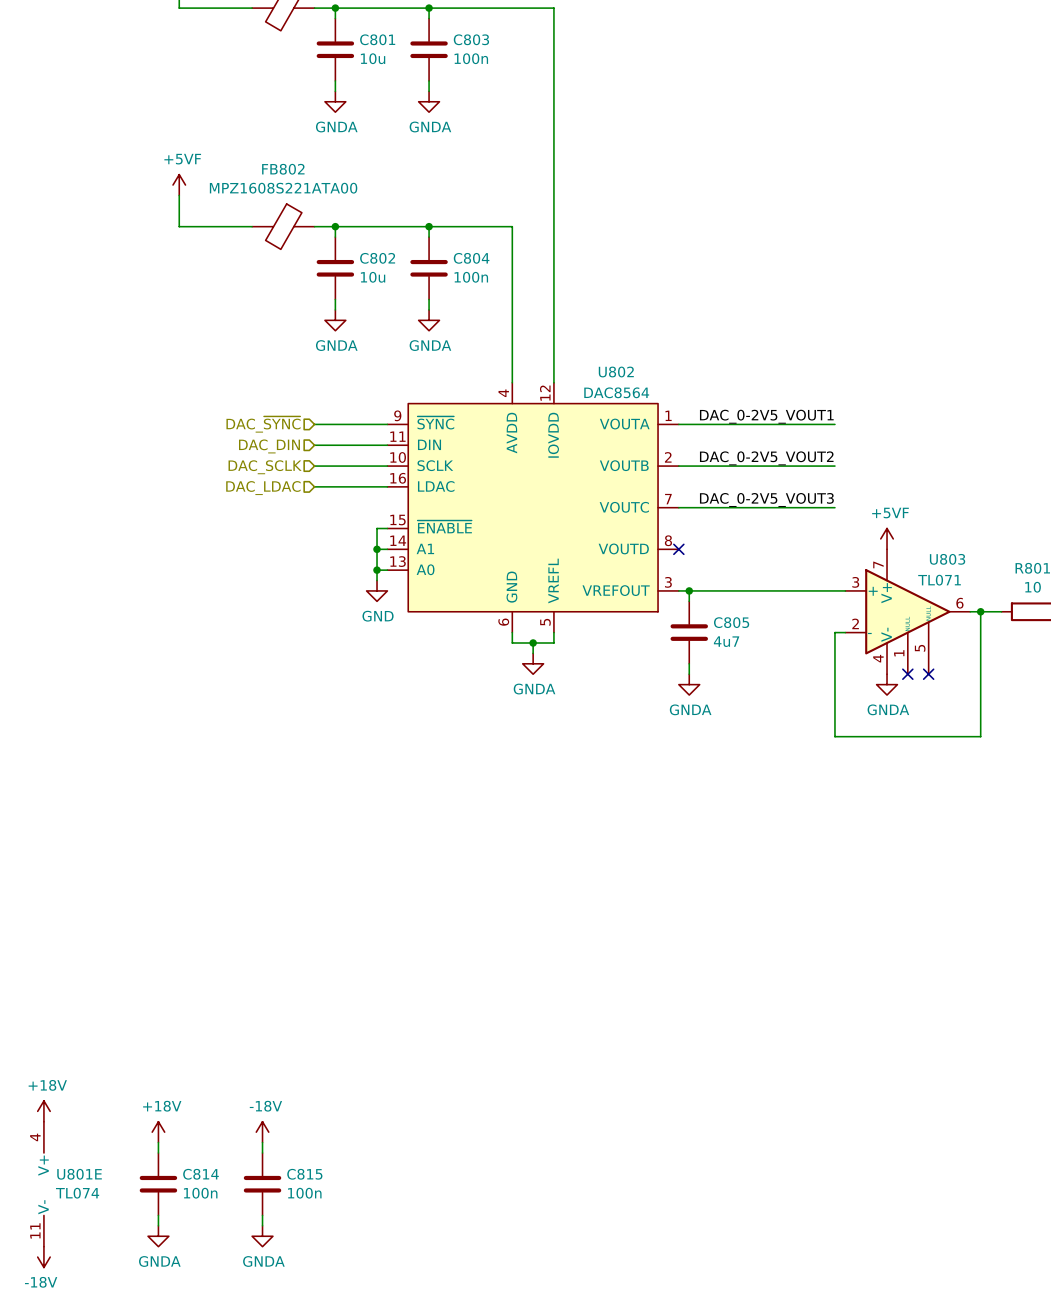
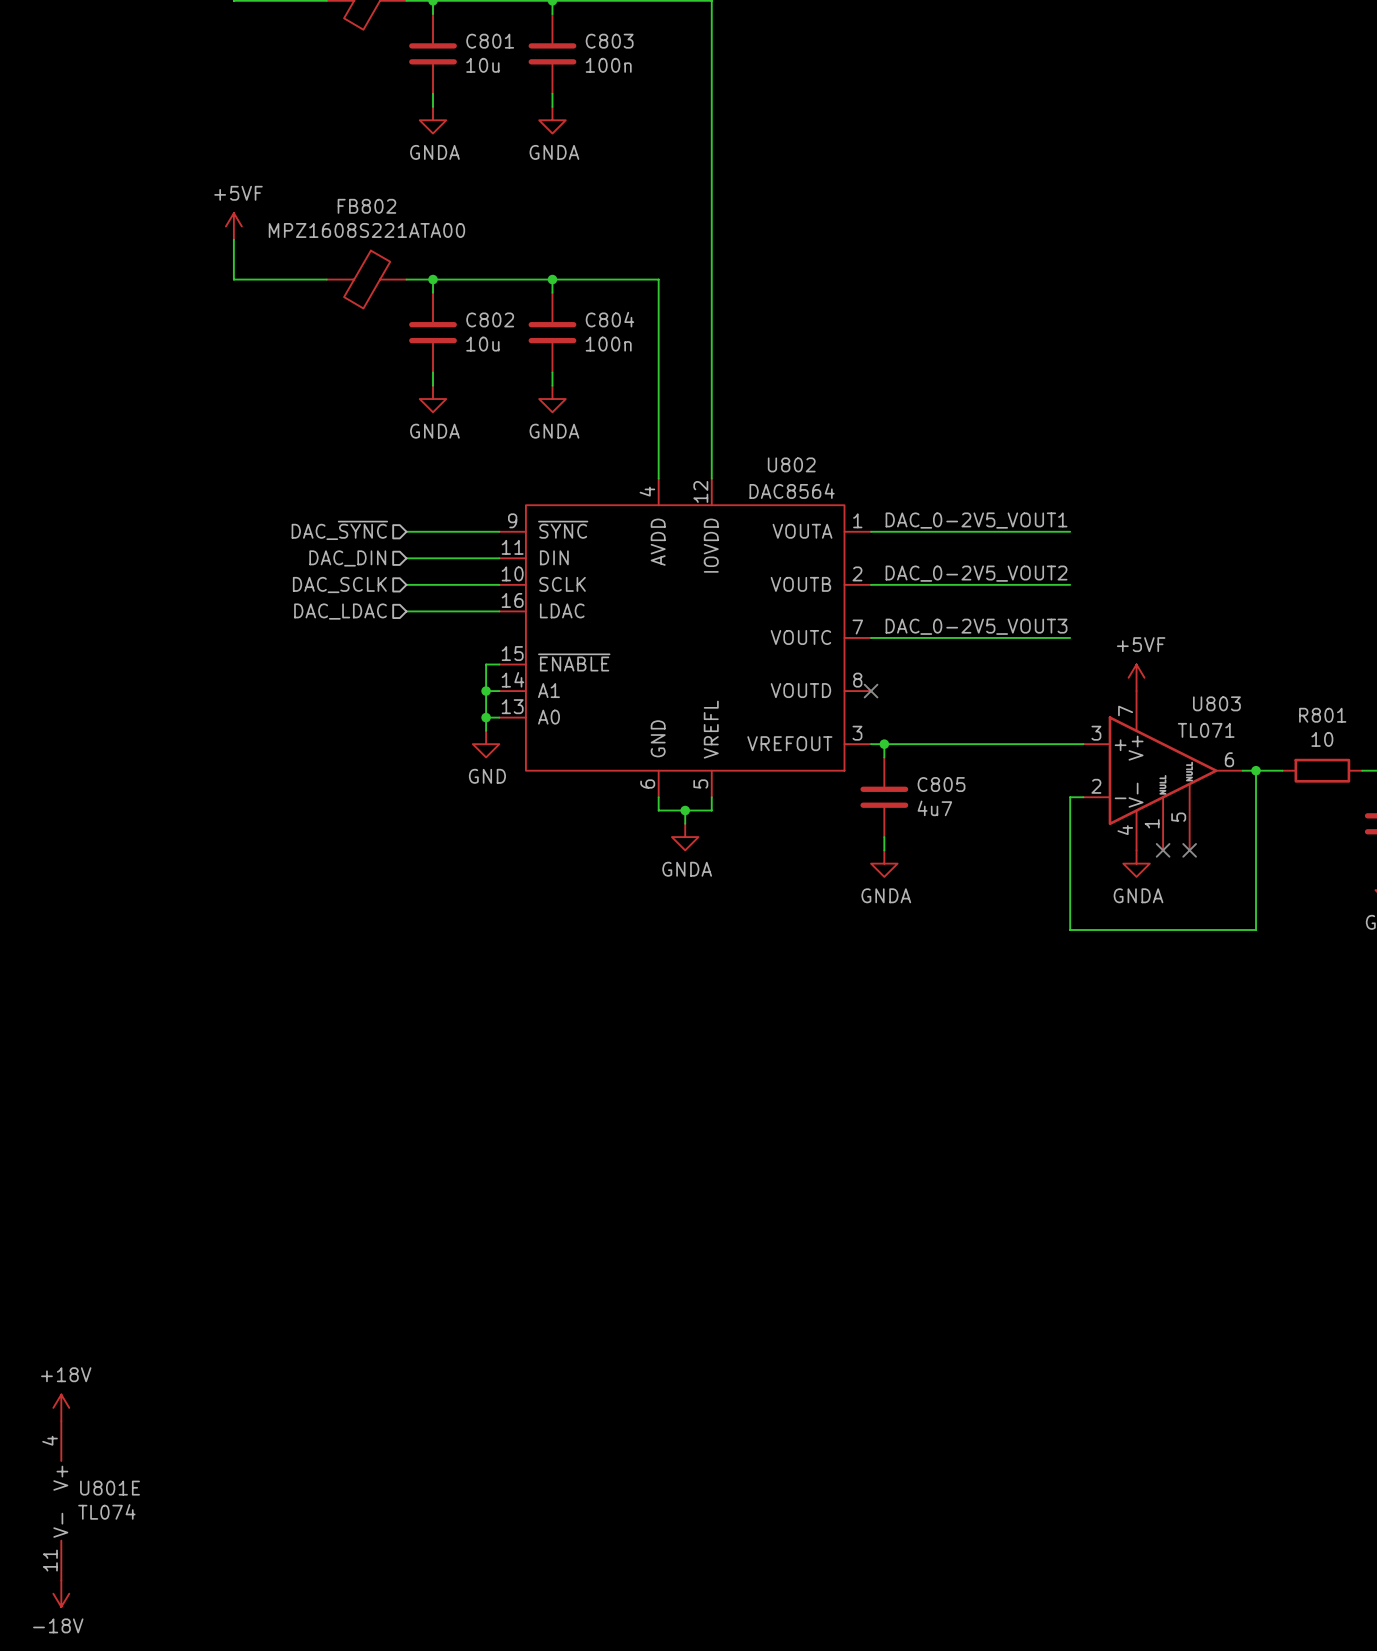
power symbol: +18V (158, 1132) -> none
power symbol: -18V (262, 1132) -> none
wire: (158, 1142) (158, 1153) -> none
wire: (262, 1142) (262, 1153) -> none
C814: 100n (158, 1184) -> none
C815: 100n (262, 1184) -> none
wire: (158, 1215) (158, 1225) -> none
wire: (262, 1215) (262, 1225) -> none
power symbol: GNDA (158, 1236) -> none
power symbol: GNDA (262, 1236) -> none

